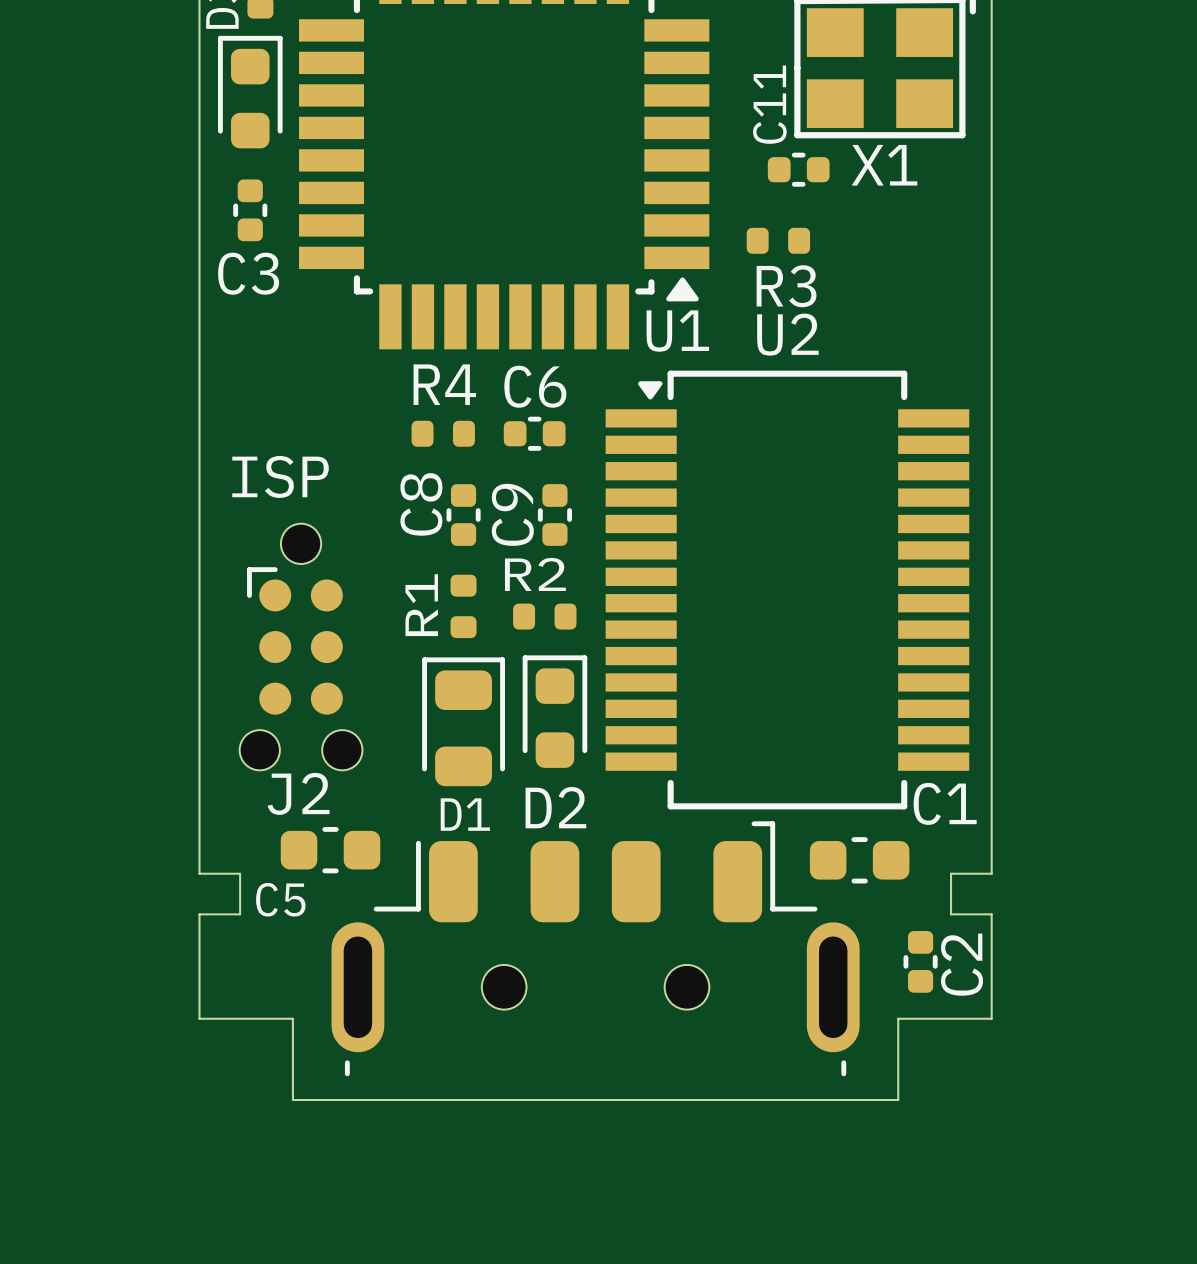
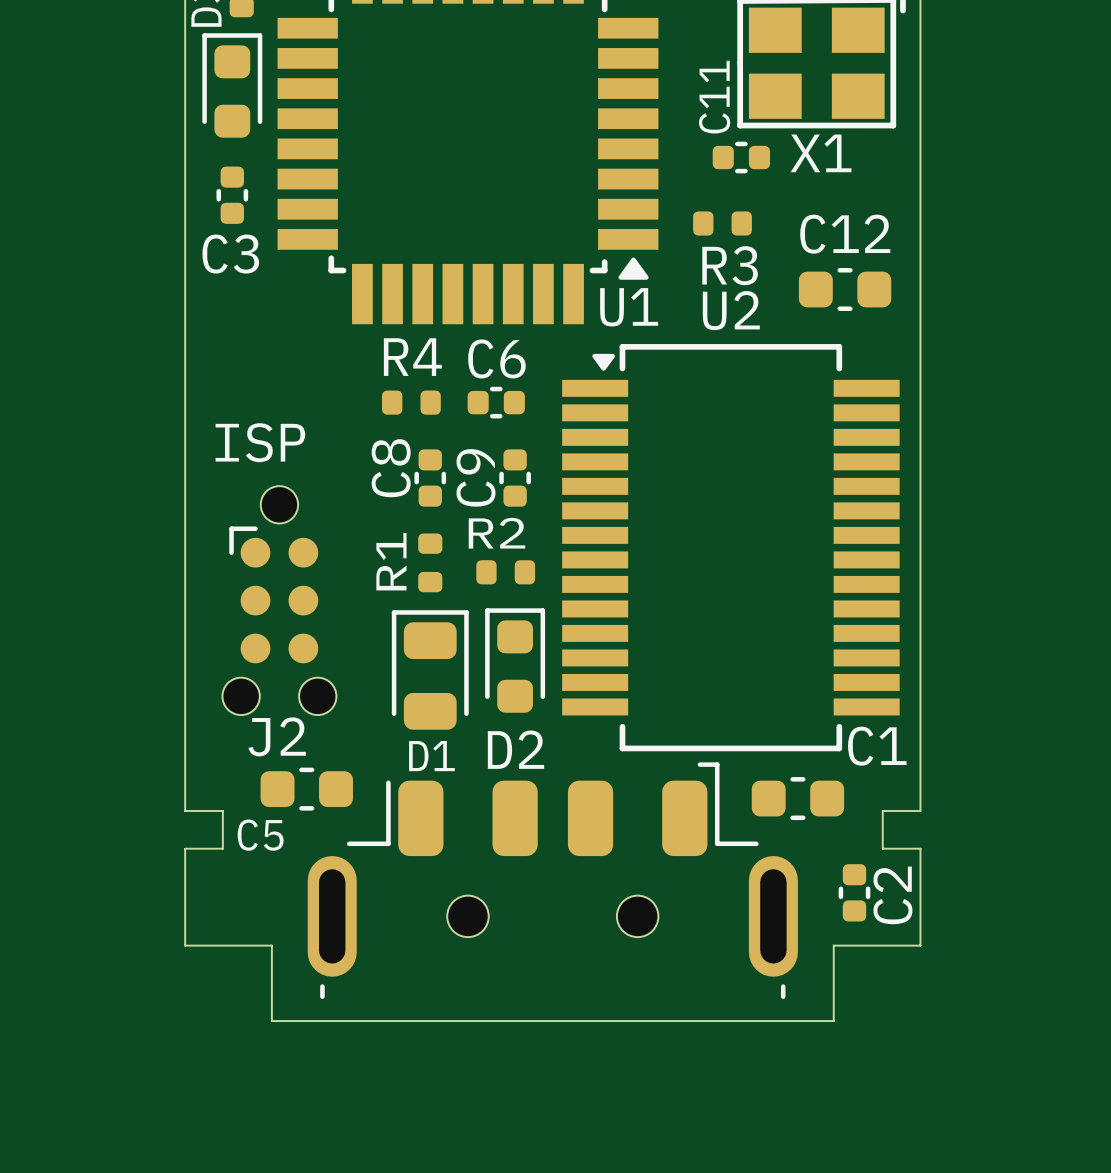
C12: none -> (845, 289)

